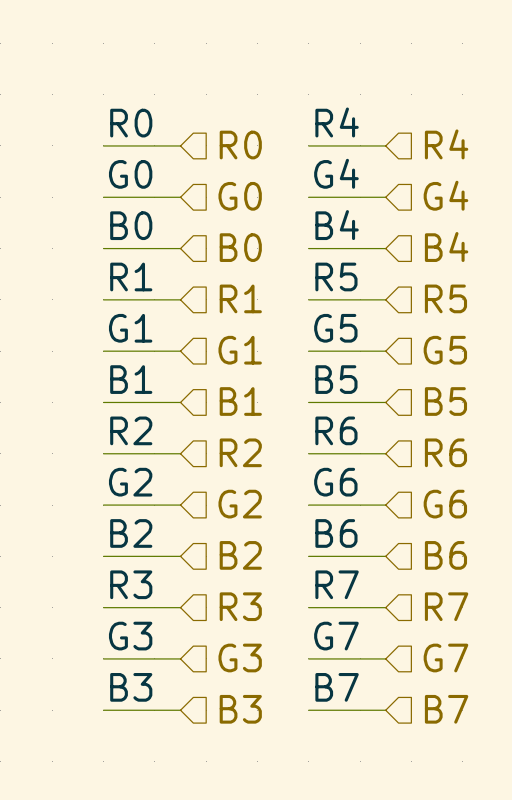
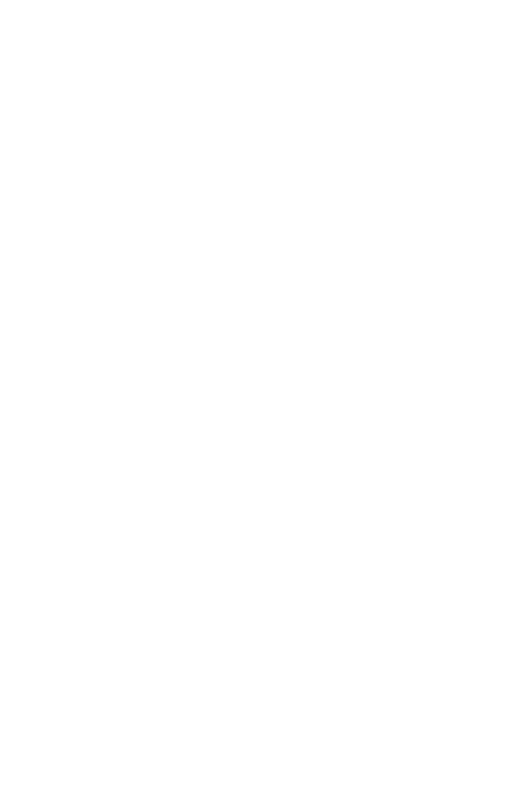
label: R4 (337, 122) -> none
label: R0 (131, 123) -> none
hierarchical label: R4 (446, 144) -> none
wire: (103, 145) (180, 145) -> none
hierarchical label: R0 (240, 145) -> none
wire: (308, 145) (385, 145) -> none
label: G4 (336, 173) -> none
label: G0 (130, 174) -> none
hierarchical label: G4 (445, 195) -> none
hierarchical label: G0 (240, 196) -> none
wire: (103, 197) (180, 197) -> none
wire: (308, 197) (385, 197) -> none
label: B0 (131, 225) -> none
label: B4 (337, 225) -> none
hierarchical label: B0 (240, 247) -> none
hierarchical label: B4 (446, 247) -> none
wire: (103, 248) (180, 248) -> none
wire: (308, 248) (385, 248) -> none
label: R1 (131, 276) -> none
label: R5 (336, 276) -> none
hierarchical label: R1 (240, 298) -> none
hierarchical label: R5 (445, 298) -> none
wire: (103, 299) (180, 299) -> none
wire: (308, 299) (385, 299) -> none
label: G1 (130, 328) -> none
label: G5 (335, 328) -> none
hierarchical label: G1 (240, 350) -> none
hierarchical label: G5 (445, 350) -> none
wire: (103, 351) (180, 351) -> none
wire: (308, 351) (385, 351) -> none
label: B1 (131, 379) -> none
label: B5 (336, 379) -> none
hierarchical label: B1 (240, 401) -> none
hierarchical label: B5 (445, 401) -> none
wire: (103, 402) (180, 402) -> none
wire: (308, 402) (385, 402) -> none
label: R2 (131, 430) -> none
label: R6 (336, 430) -> none
hierarchical label: R2 (240, 452) -> none
hierarchical label: R6 (445, 452) -> none
wire: (103, 453) (180, 453) -> none
wire: (308, 453) (385, 453) -> none
label: G2 (130, 482) -> none
label: G6 (335, 482) -> none
hierarchical label: G2 (240, 504) -> none
hierarchical label: G6 (445, 504) -> none
wire: (103, 505) (180, 505) -> none
wire: (308, 505) (385, 505) -> none
label: B2 (131, 533) -> none
label: B6 (336, 533) -> none
hierarchical label: B2 (240, 555) -> none
hierarchical label: B6 (445, 555) -> none
wire: (103, 556) (180, 556) -> none
wire: (308, 556) (385, 556) -> none
label: R3 (131, 584) -> none
label: R7 (337, 584) -> none
hierarchical label: R3 (240, 606) -> none
hierarchical label: R7 (446, 606) -> none
wire: (103, 607) (180, 607) -> none
wire: (308, 607) (385, 607) -> none
label: G3 (130, 636) -> none
label: G7 (336, 636) -> none
wire: (103, 658) (180, 658) -> none
hierarchical label: G3 (240, 658) -> none
wire: (308, 658) (385, 658) -> none
hierarchical label: G7 (445, 658) -> none
label: B3 (131, 687) -> none
label: B7 (337, 687) -> none
hierarchical label: B3 (240, 709) -> none
hierarchical label: B7 (446, 709) -> none
wire: (103, 710) (180, 710) -> none
wire: (308, 710) (385, 710) -> none

